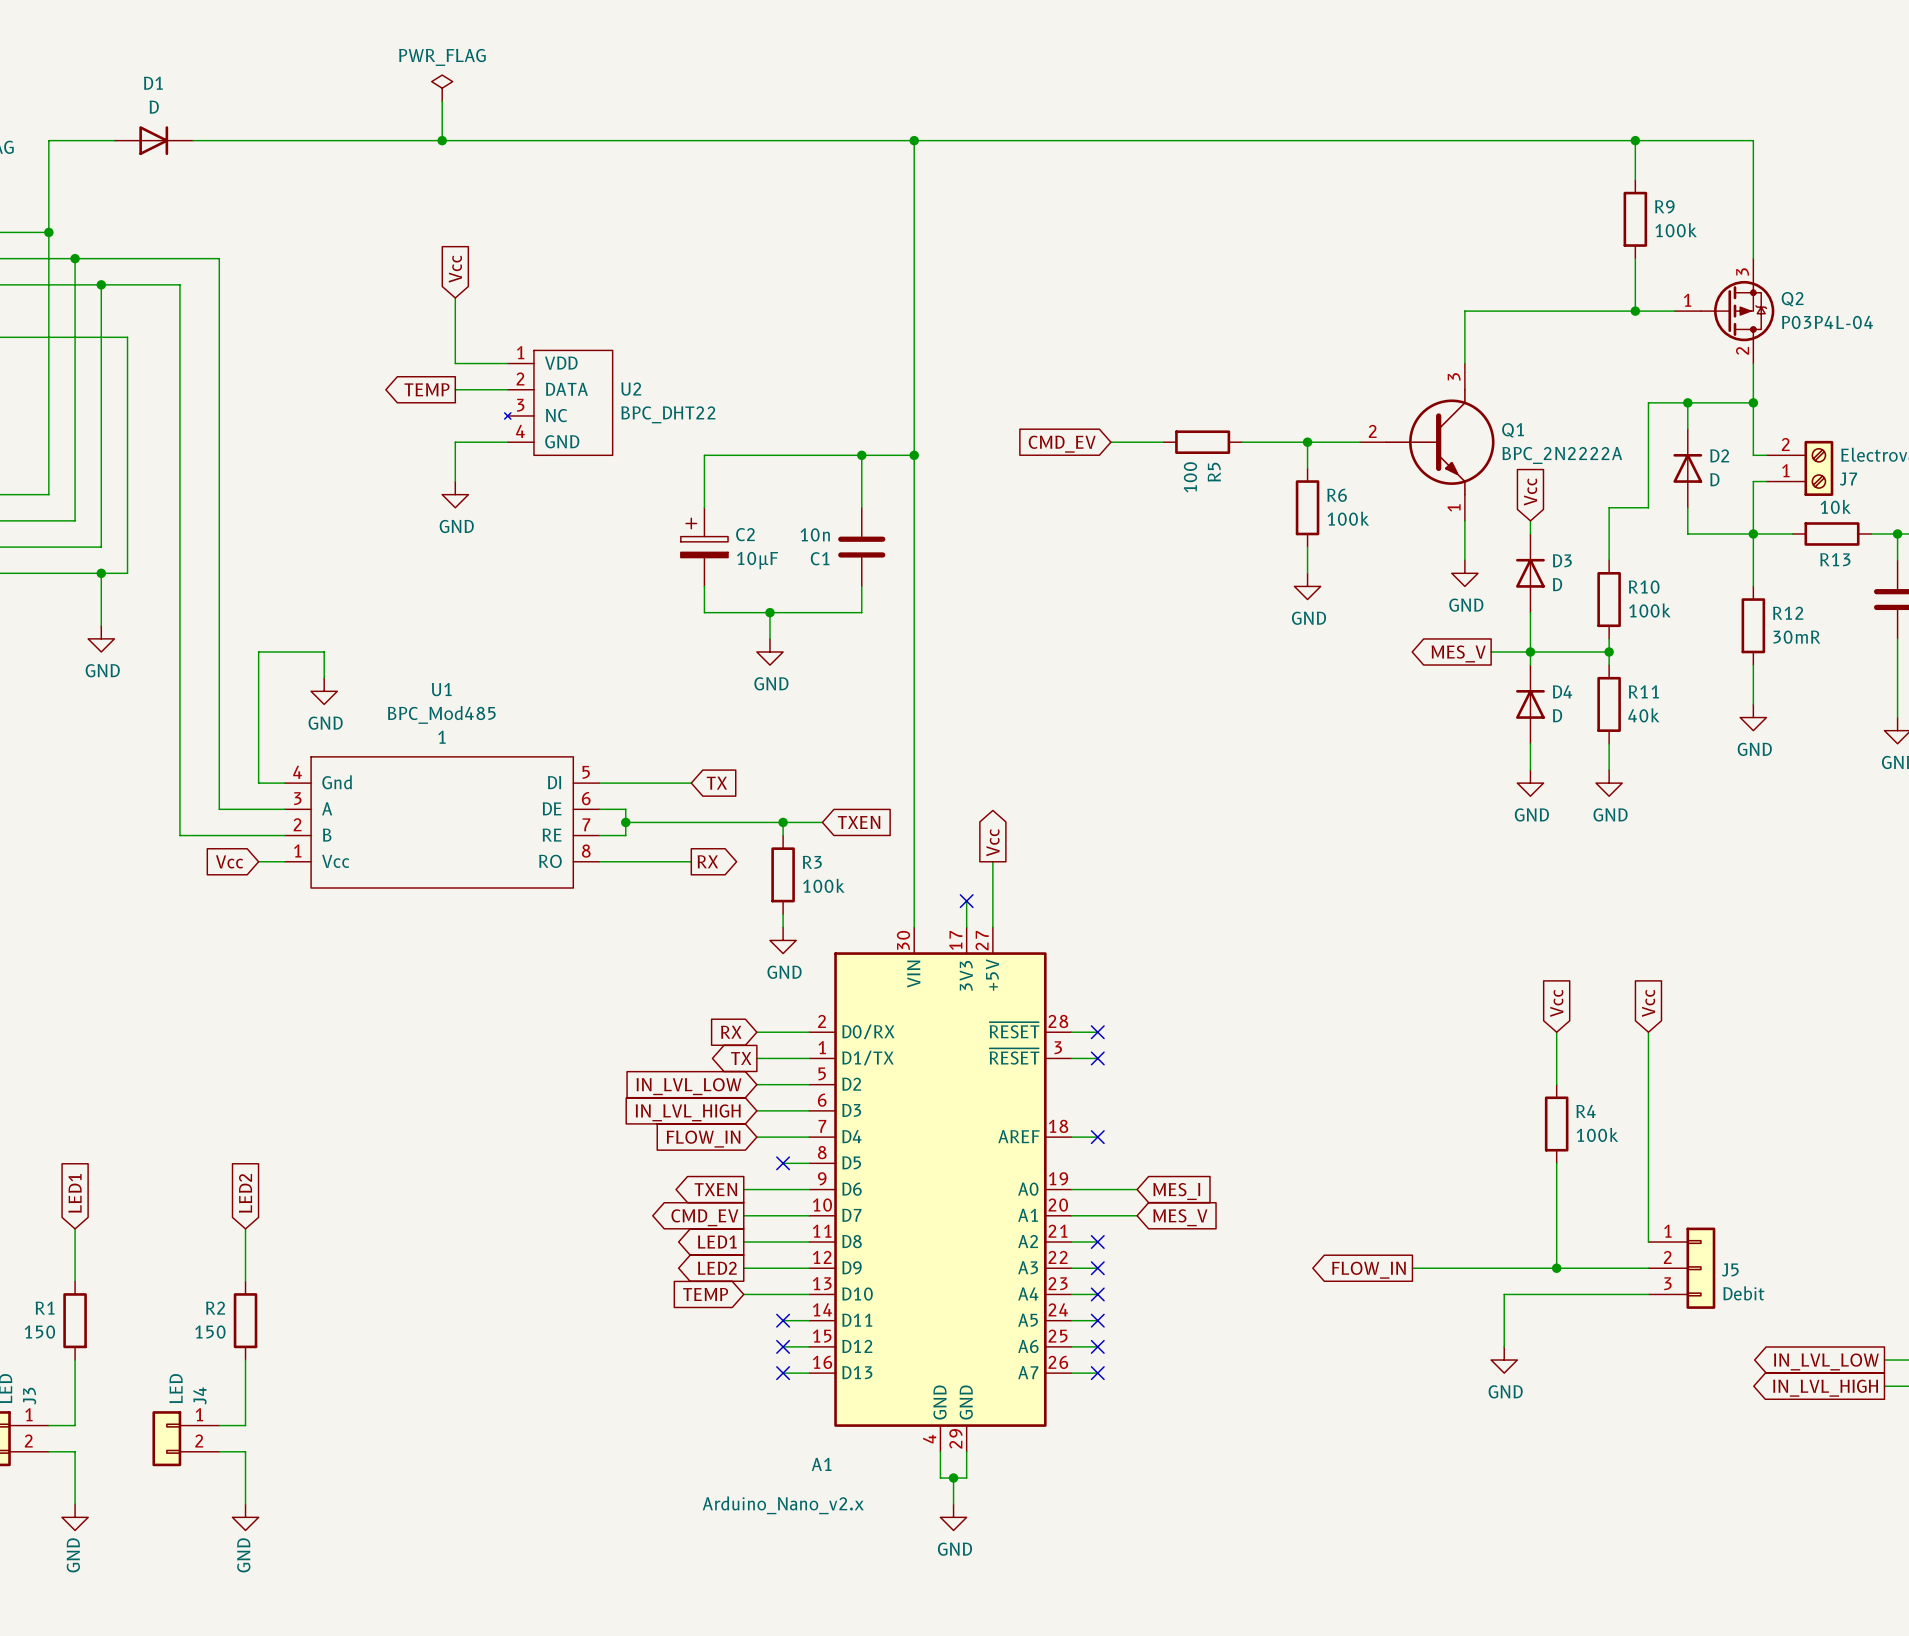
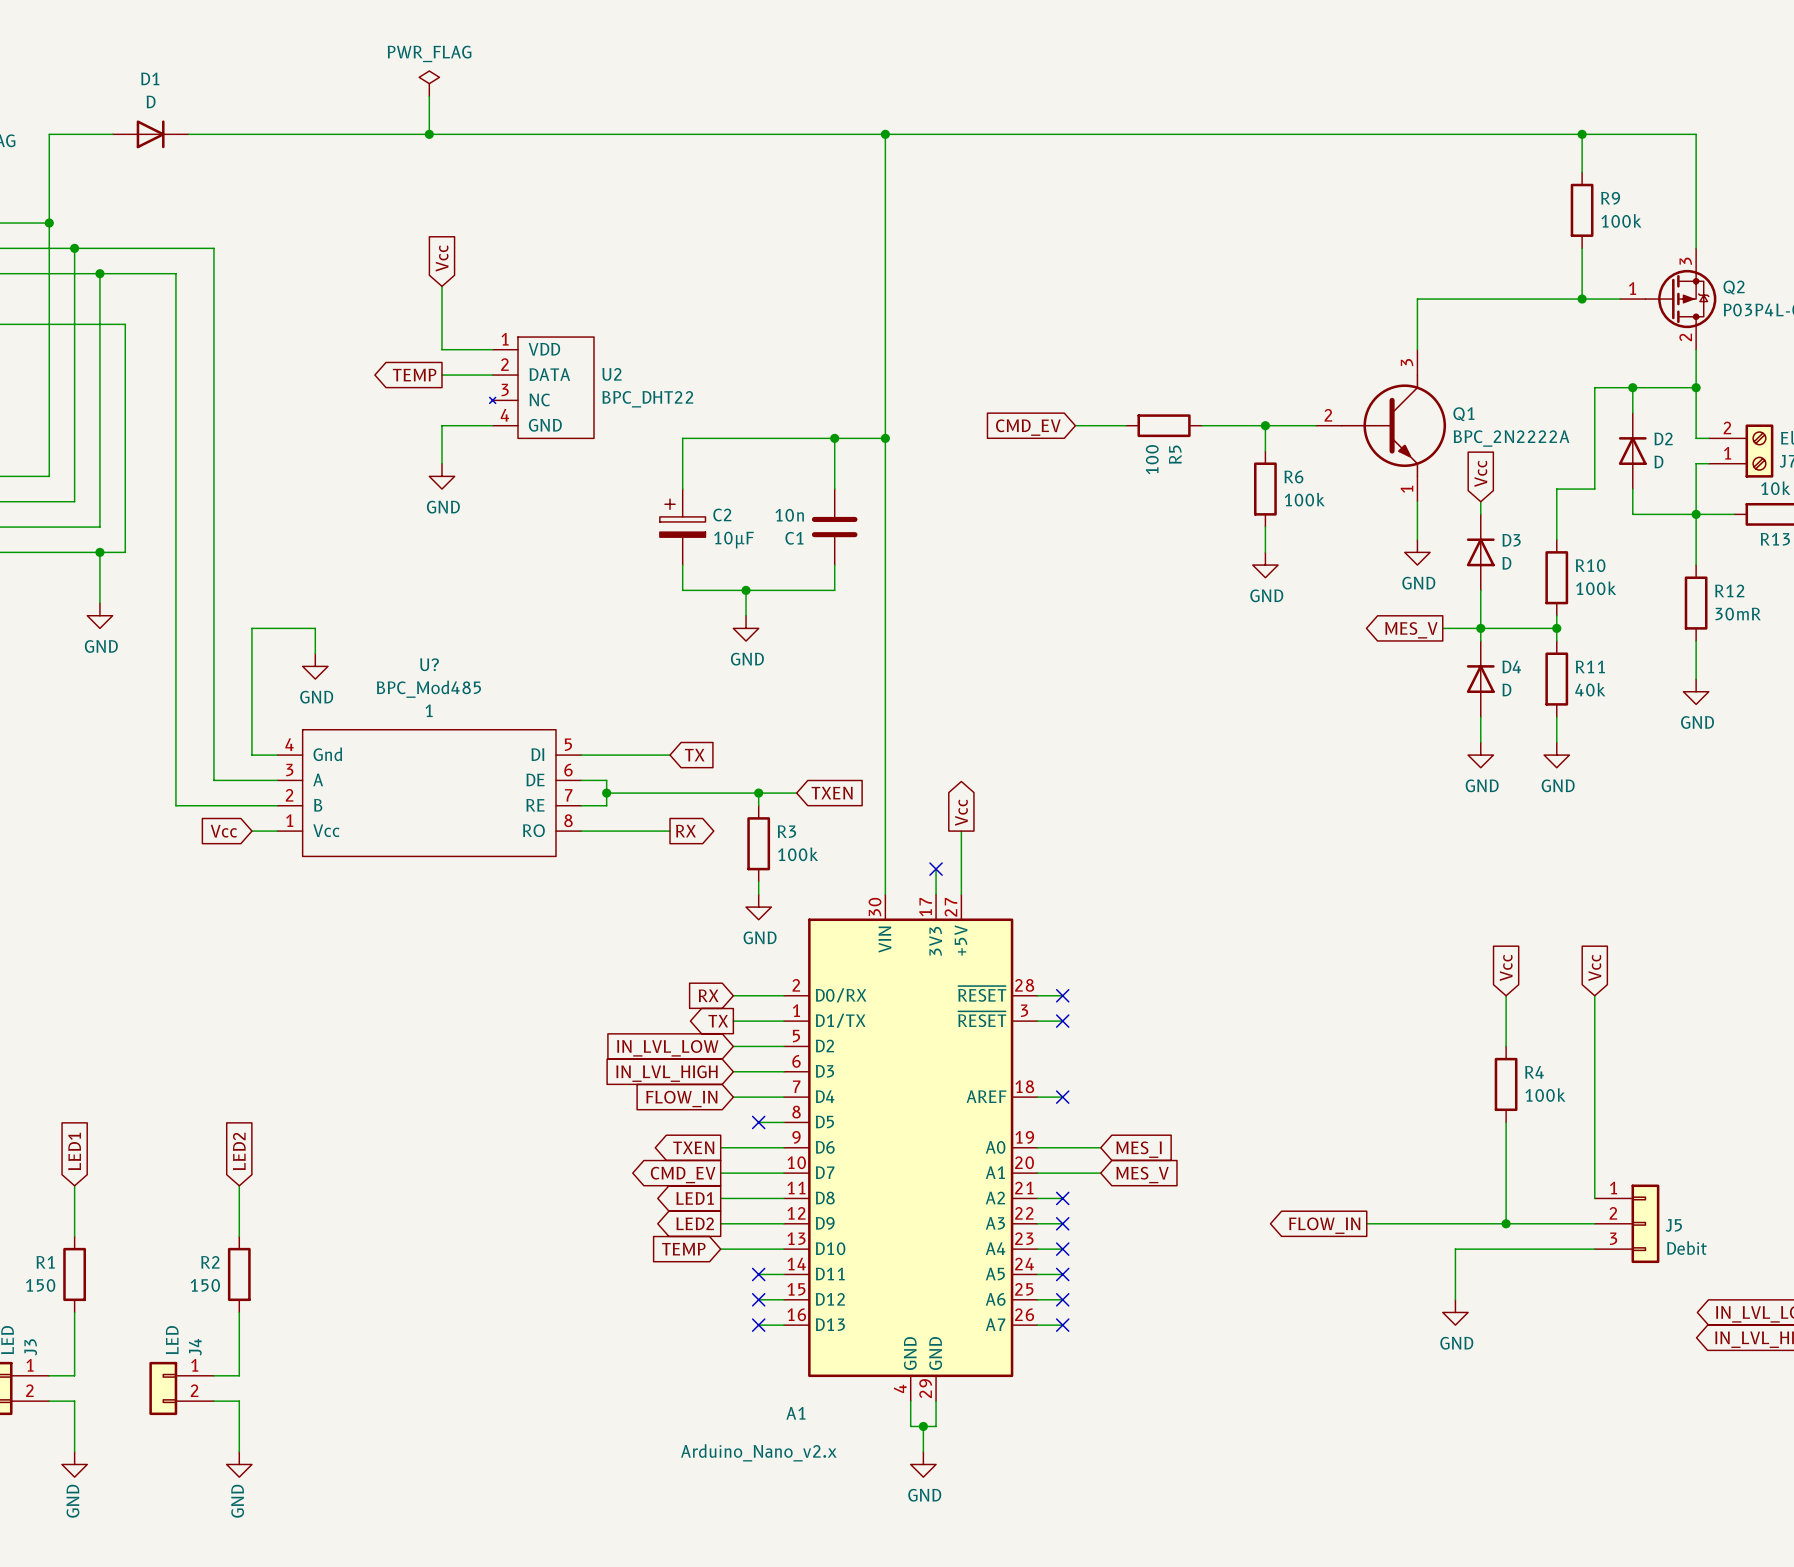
U1 name: U1 (441, 689) -> U? (429, 664)

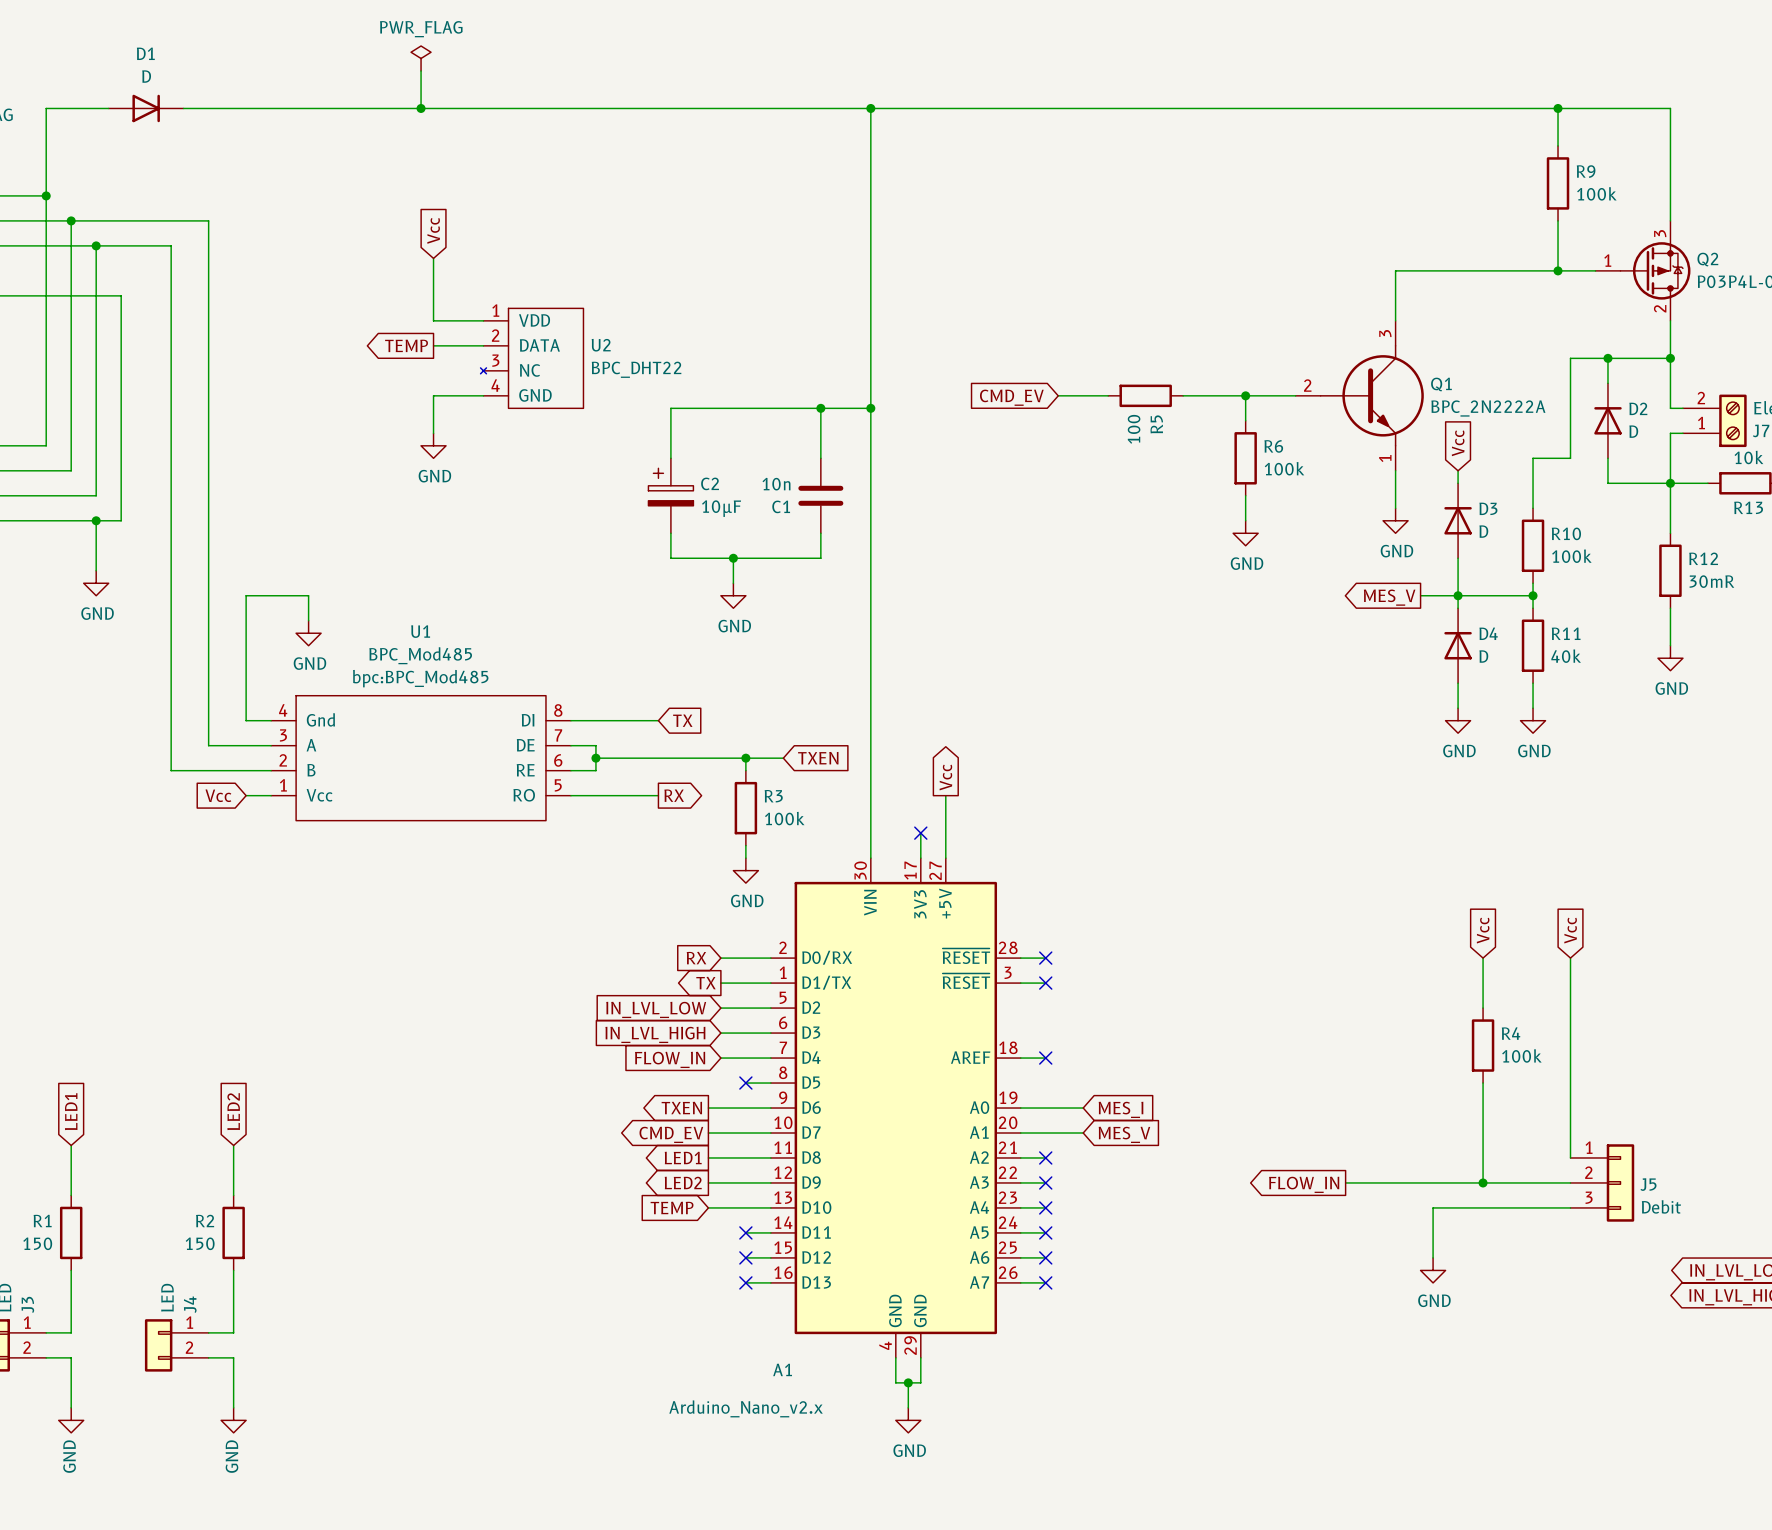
U? name: U? (429, 664) -> U1 (420, 631)
U? text: 1 (429, 710) -> none
U? text: none -> bpc:BPC_Mod485 (420, 678)
U? pin number: 5 (568, 744) -> 8 (558, 710)
U? pin number: 6 (568, 770) -> 7 (558, 735)
U? pin number: 7 (568, 795) -> 6 (558, 760)
U? pin number: 8 (568, 820) -> 5 (558, 785)

